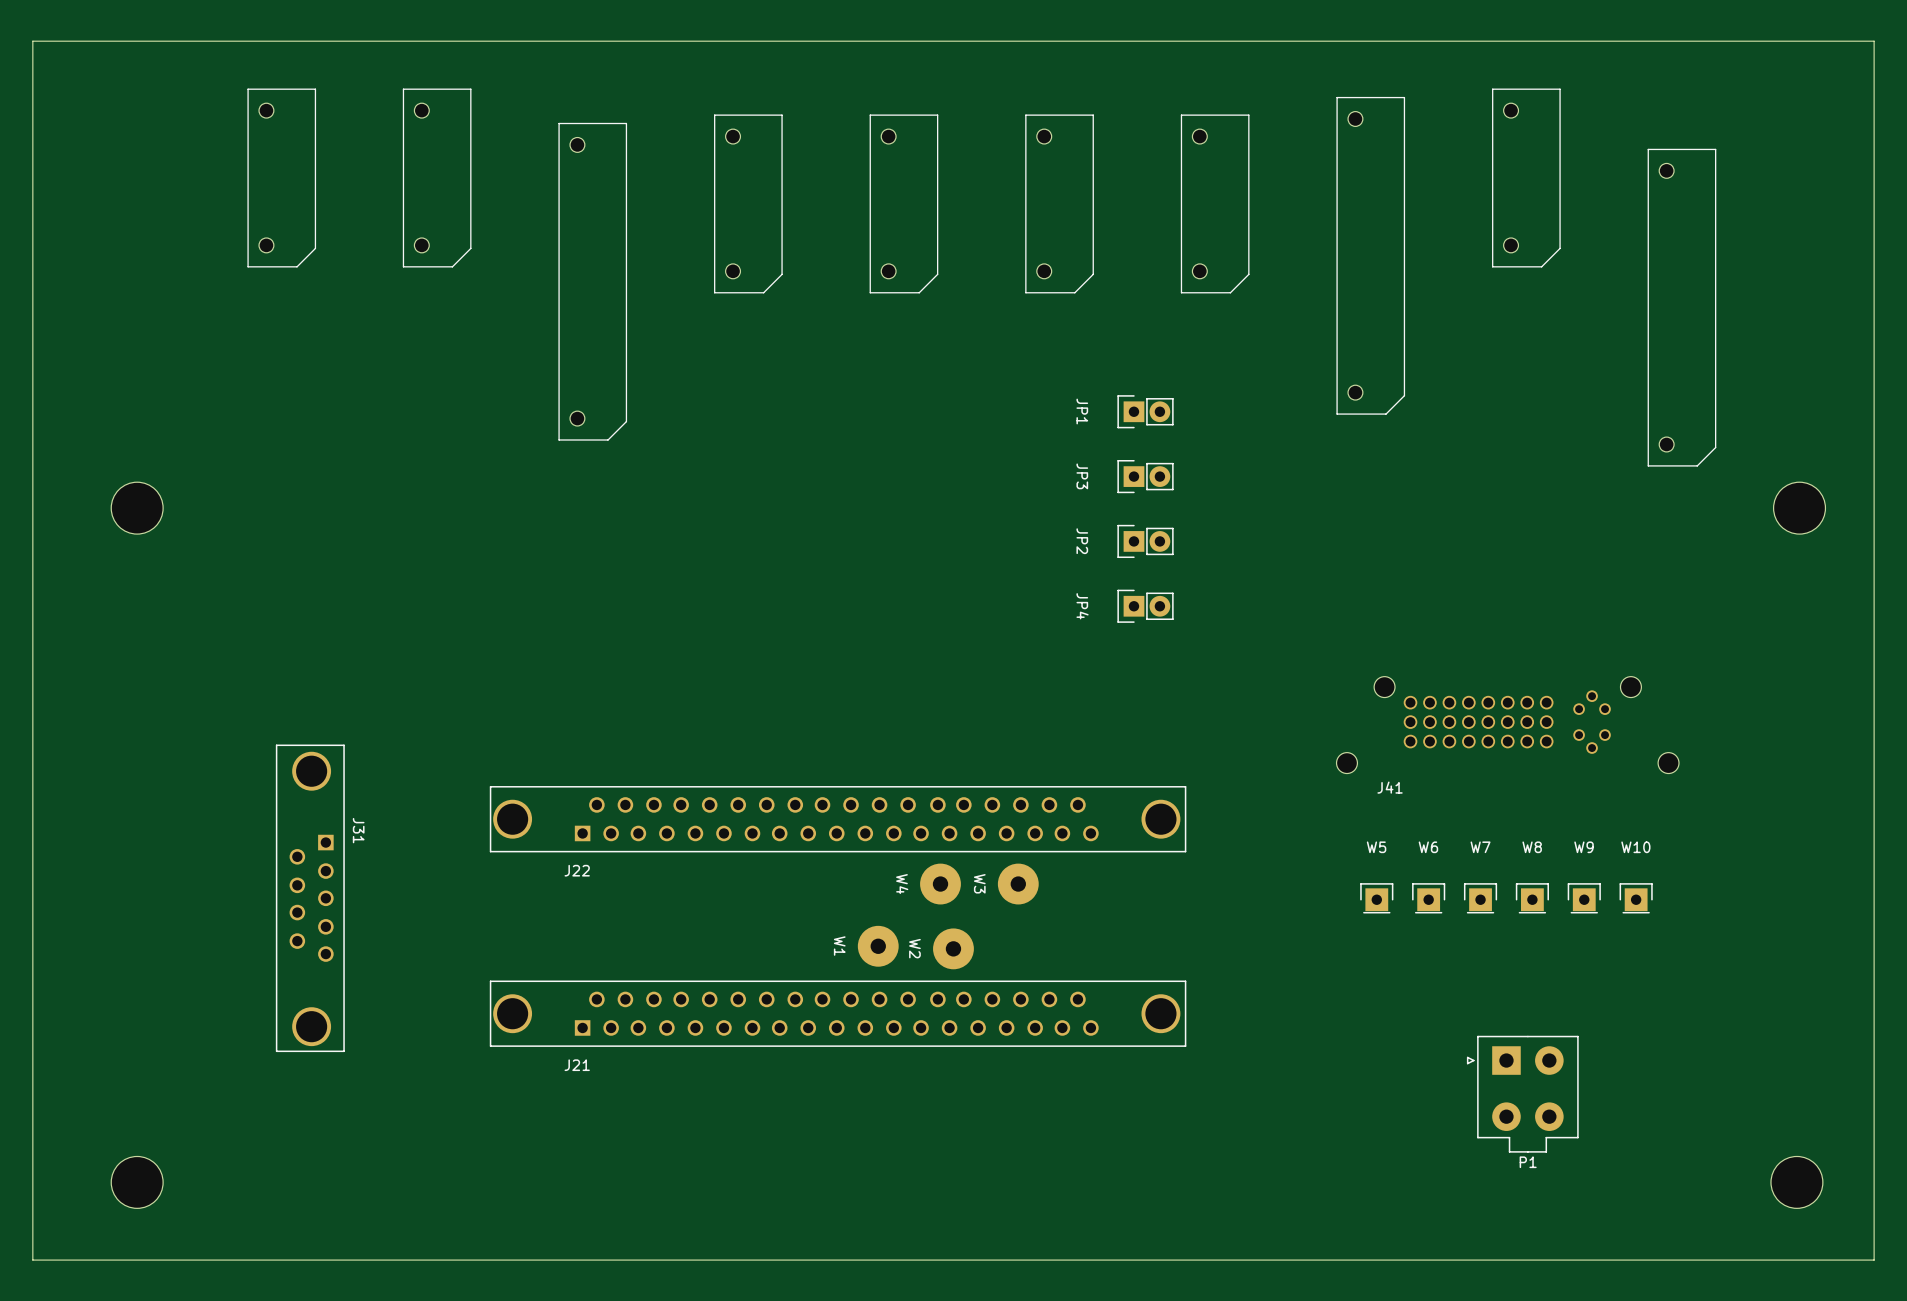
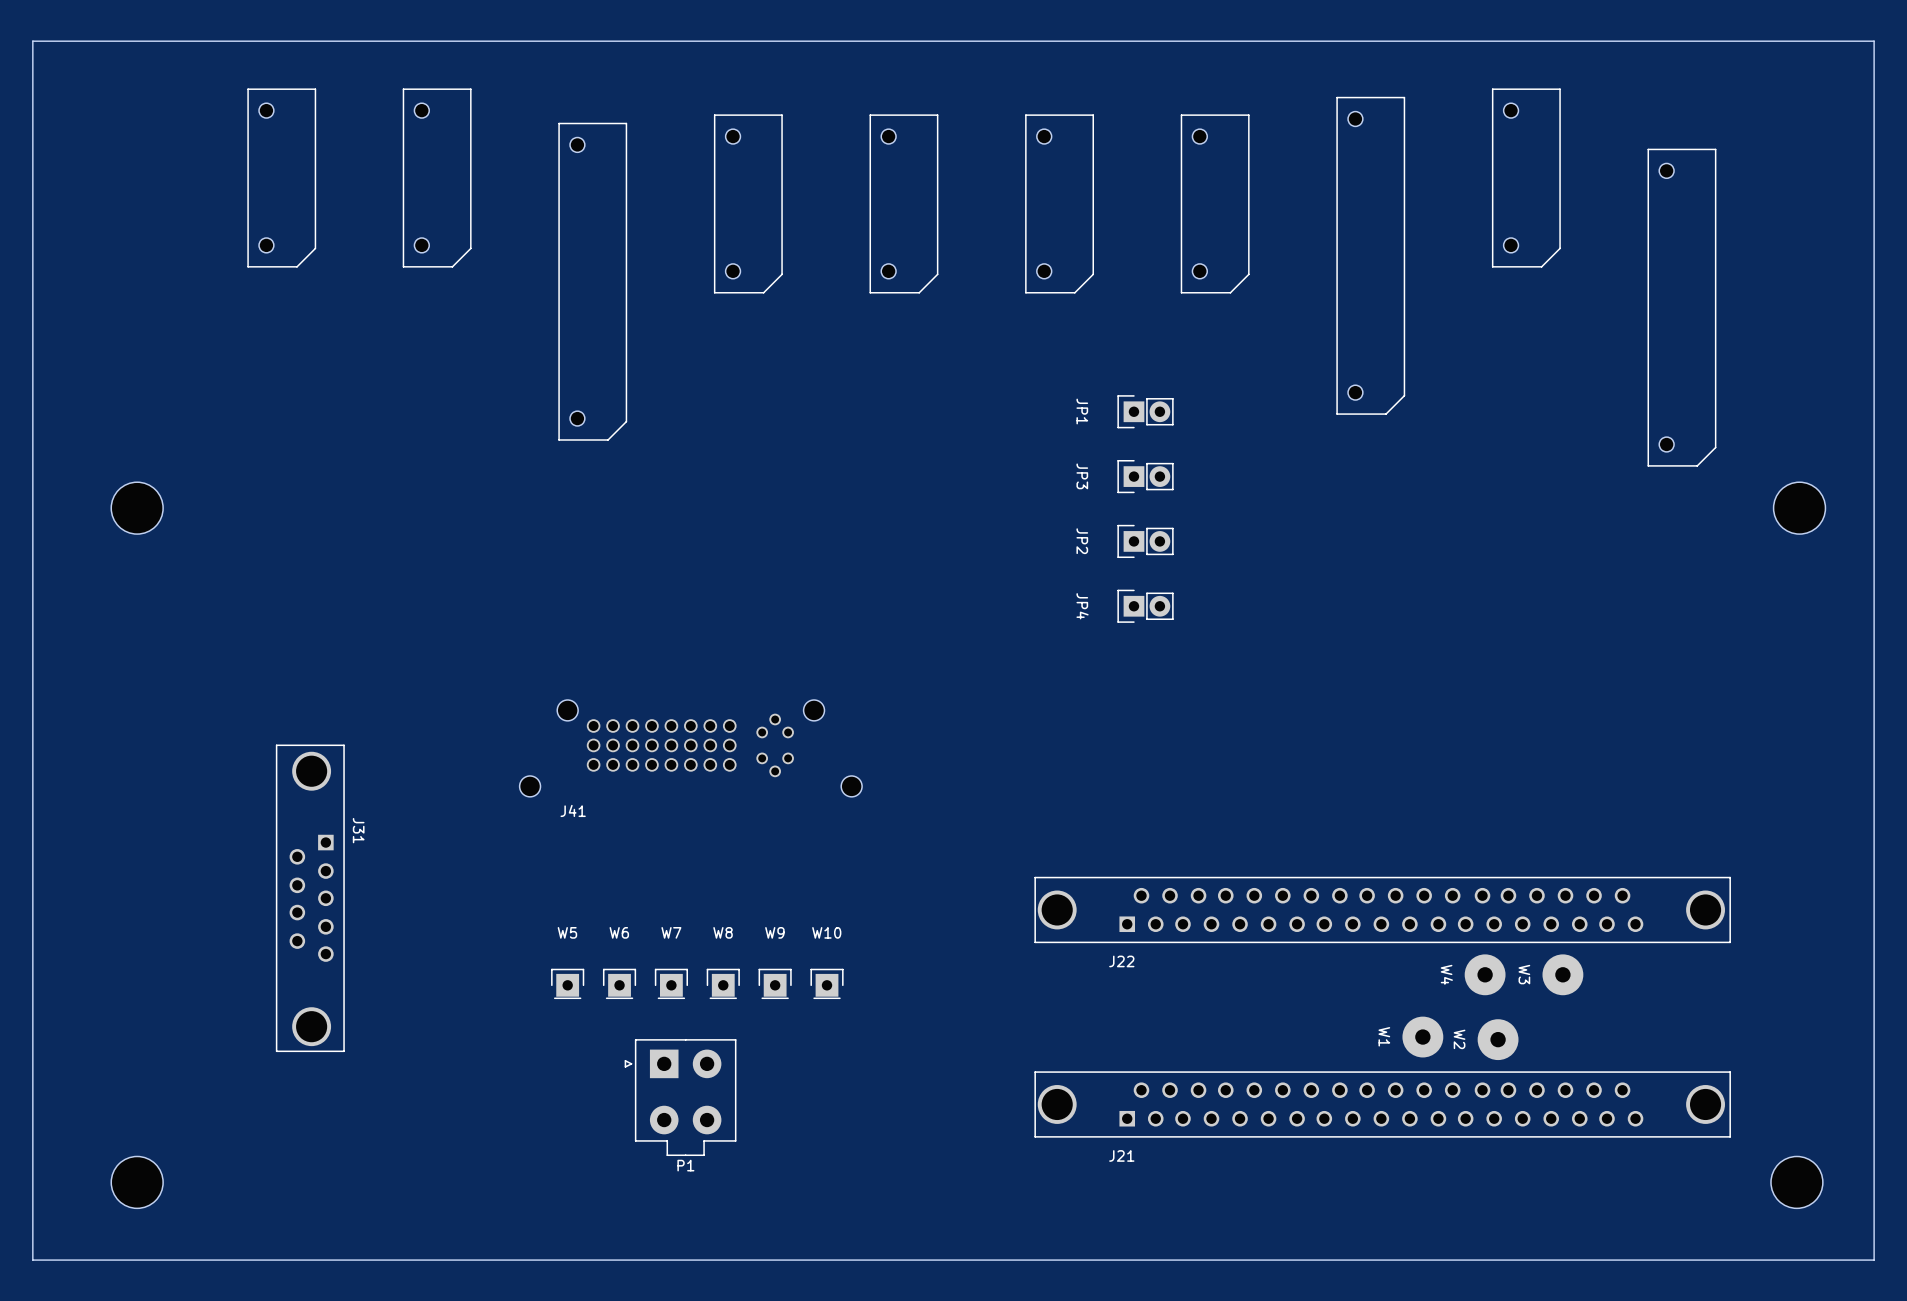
J41 position: (1507, 725) -> (690, 748)
J22 position: (838, 819) -> (1382, 909)
W4 position: (940, 884) -> (1485, 974)
W3 position: (1018, 884) -> (1562, 974)
W5 position: (1376, 898) -> (567, 983)
W6 position: (1428, 898) -> (619, 983)
W7 position: (1480, 898) -> (671, 983)
W8 position: (1532, 898) -> (723, 983)
W9 position: (1584, 898) -> (775, 983)
W10 position: (1636, 898) -> (827, 983)
W1 position: (878, 946) -> (1422, 1037)
W2 position: (953, 948) -> (1498, 1039)
J21 position: (838, 1013) -> (1382, 1104)
P1 position: (1522, 1094) -> (680, 1097)

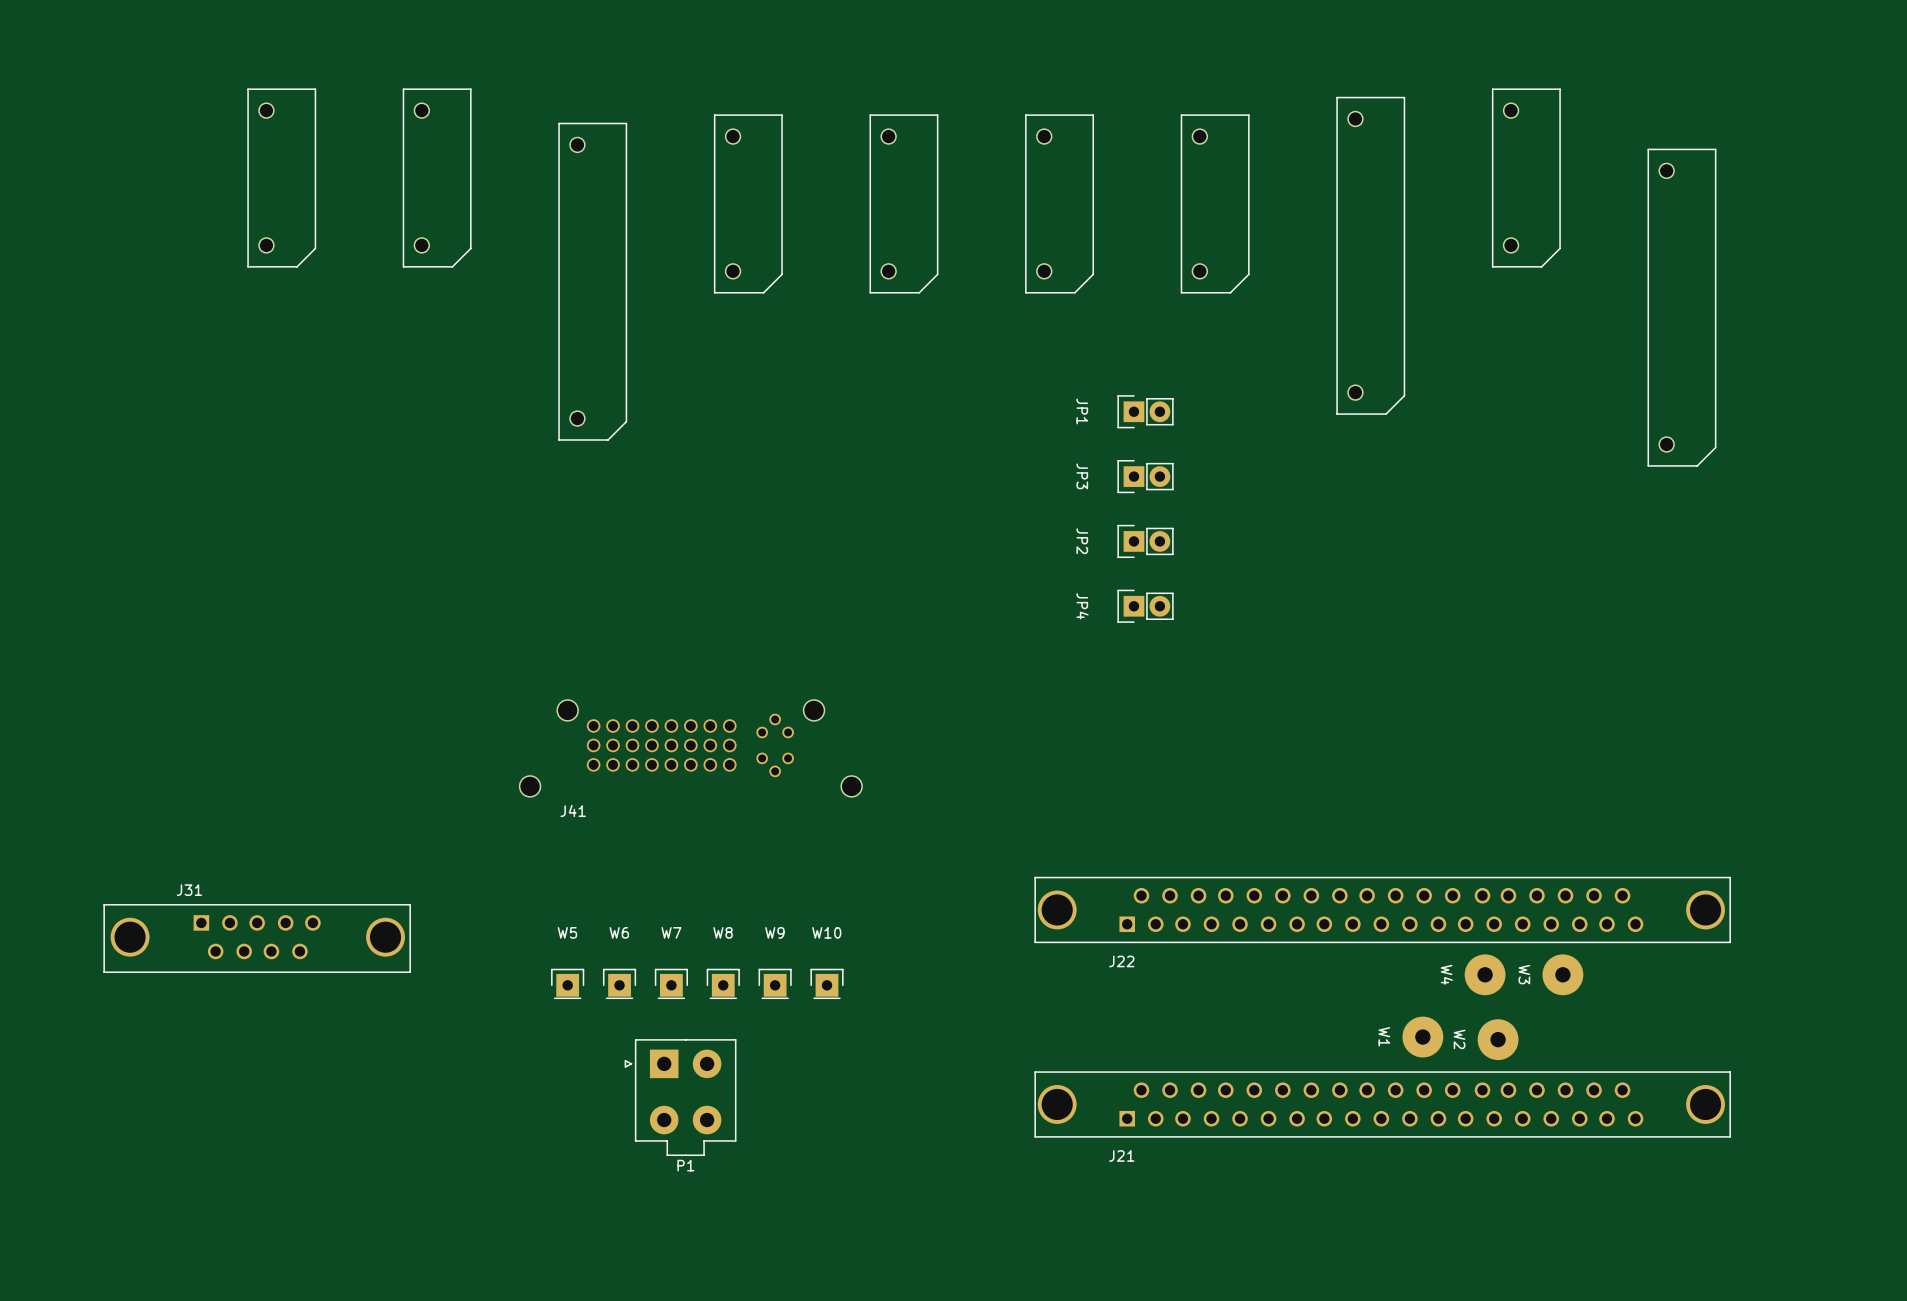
part: (137, 508) -> none
part: (1799, 508) -> none
J31 rotation: 0° (310, 898) -> 90° counterclockwise (257, 938)
part: (137, 1182) -> none
part: (1796, 1182) -> none
board edge: (1874, 1260) (32, 1260) (32, 41) (1874, 41) (1874, 1260) -> none

